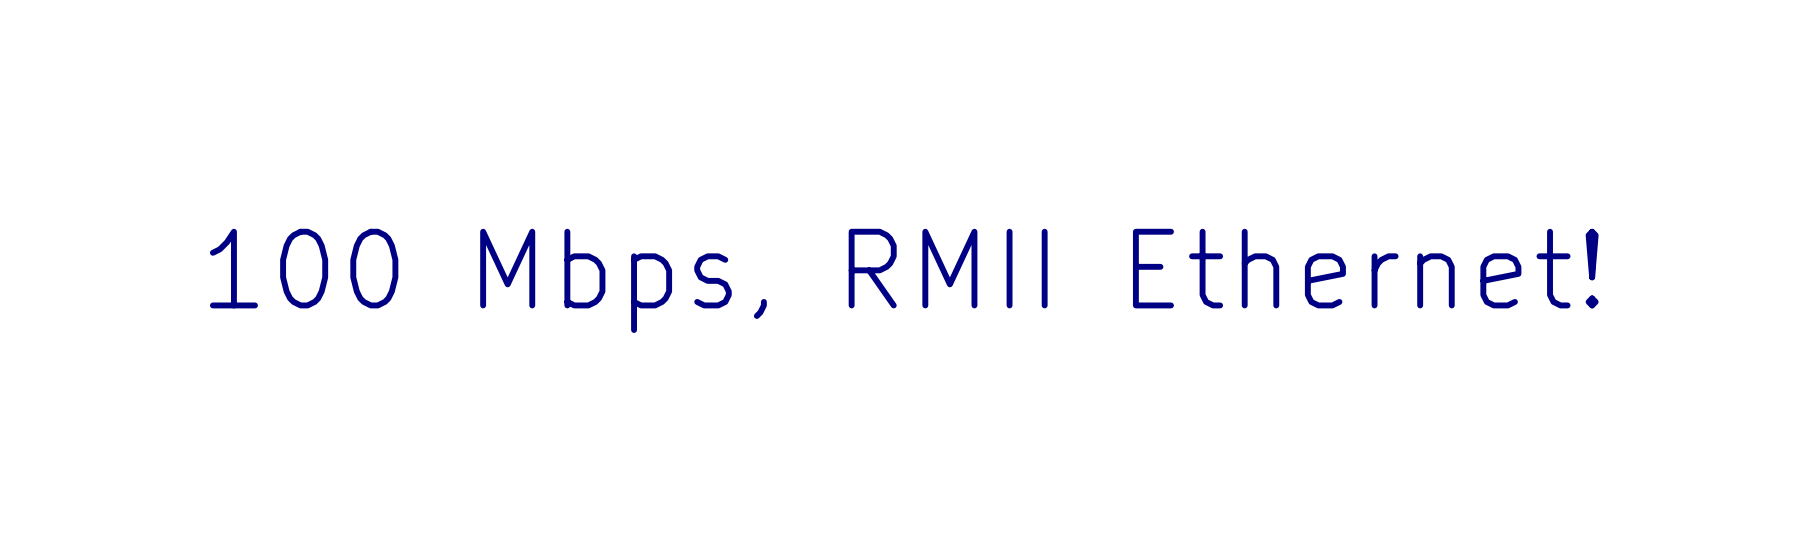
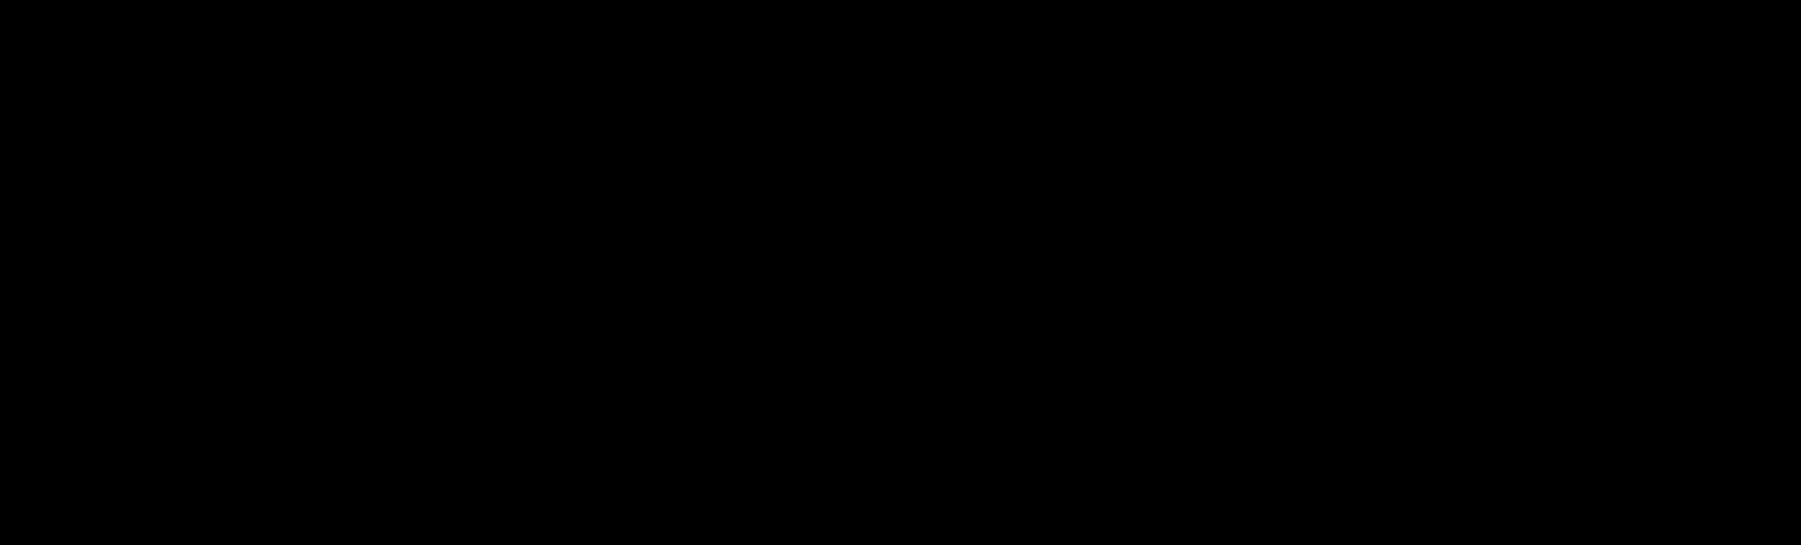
text: 100 Mbps, RMII Ethernet! (904, 280) -> none

